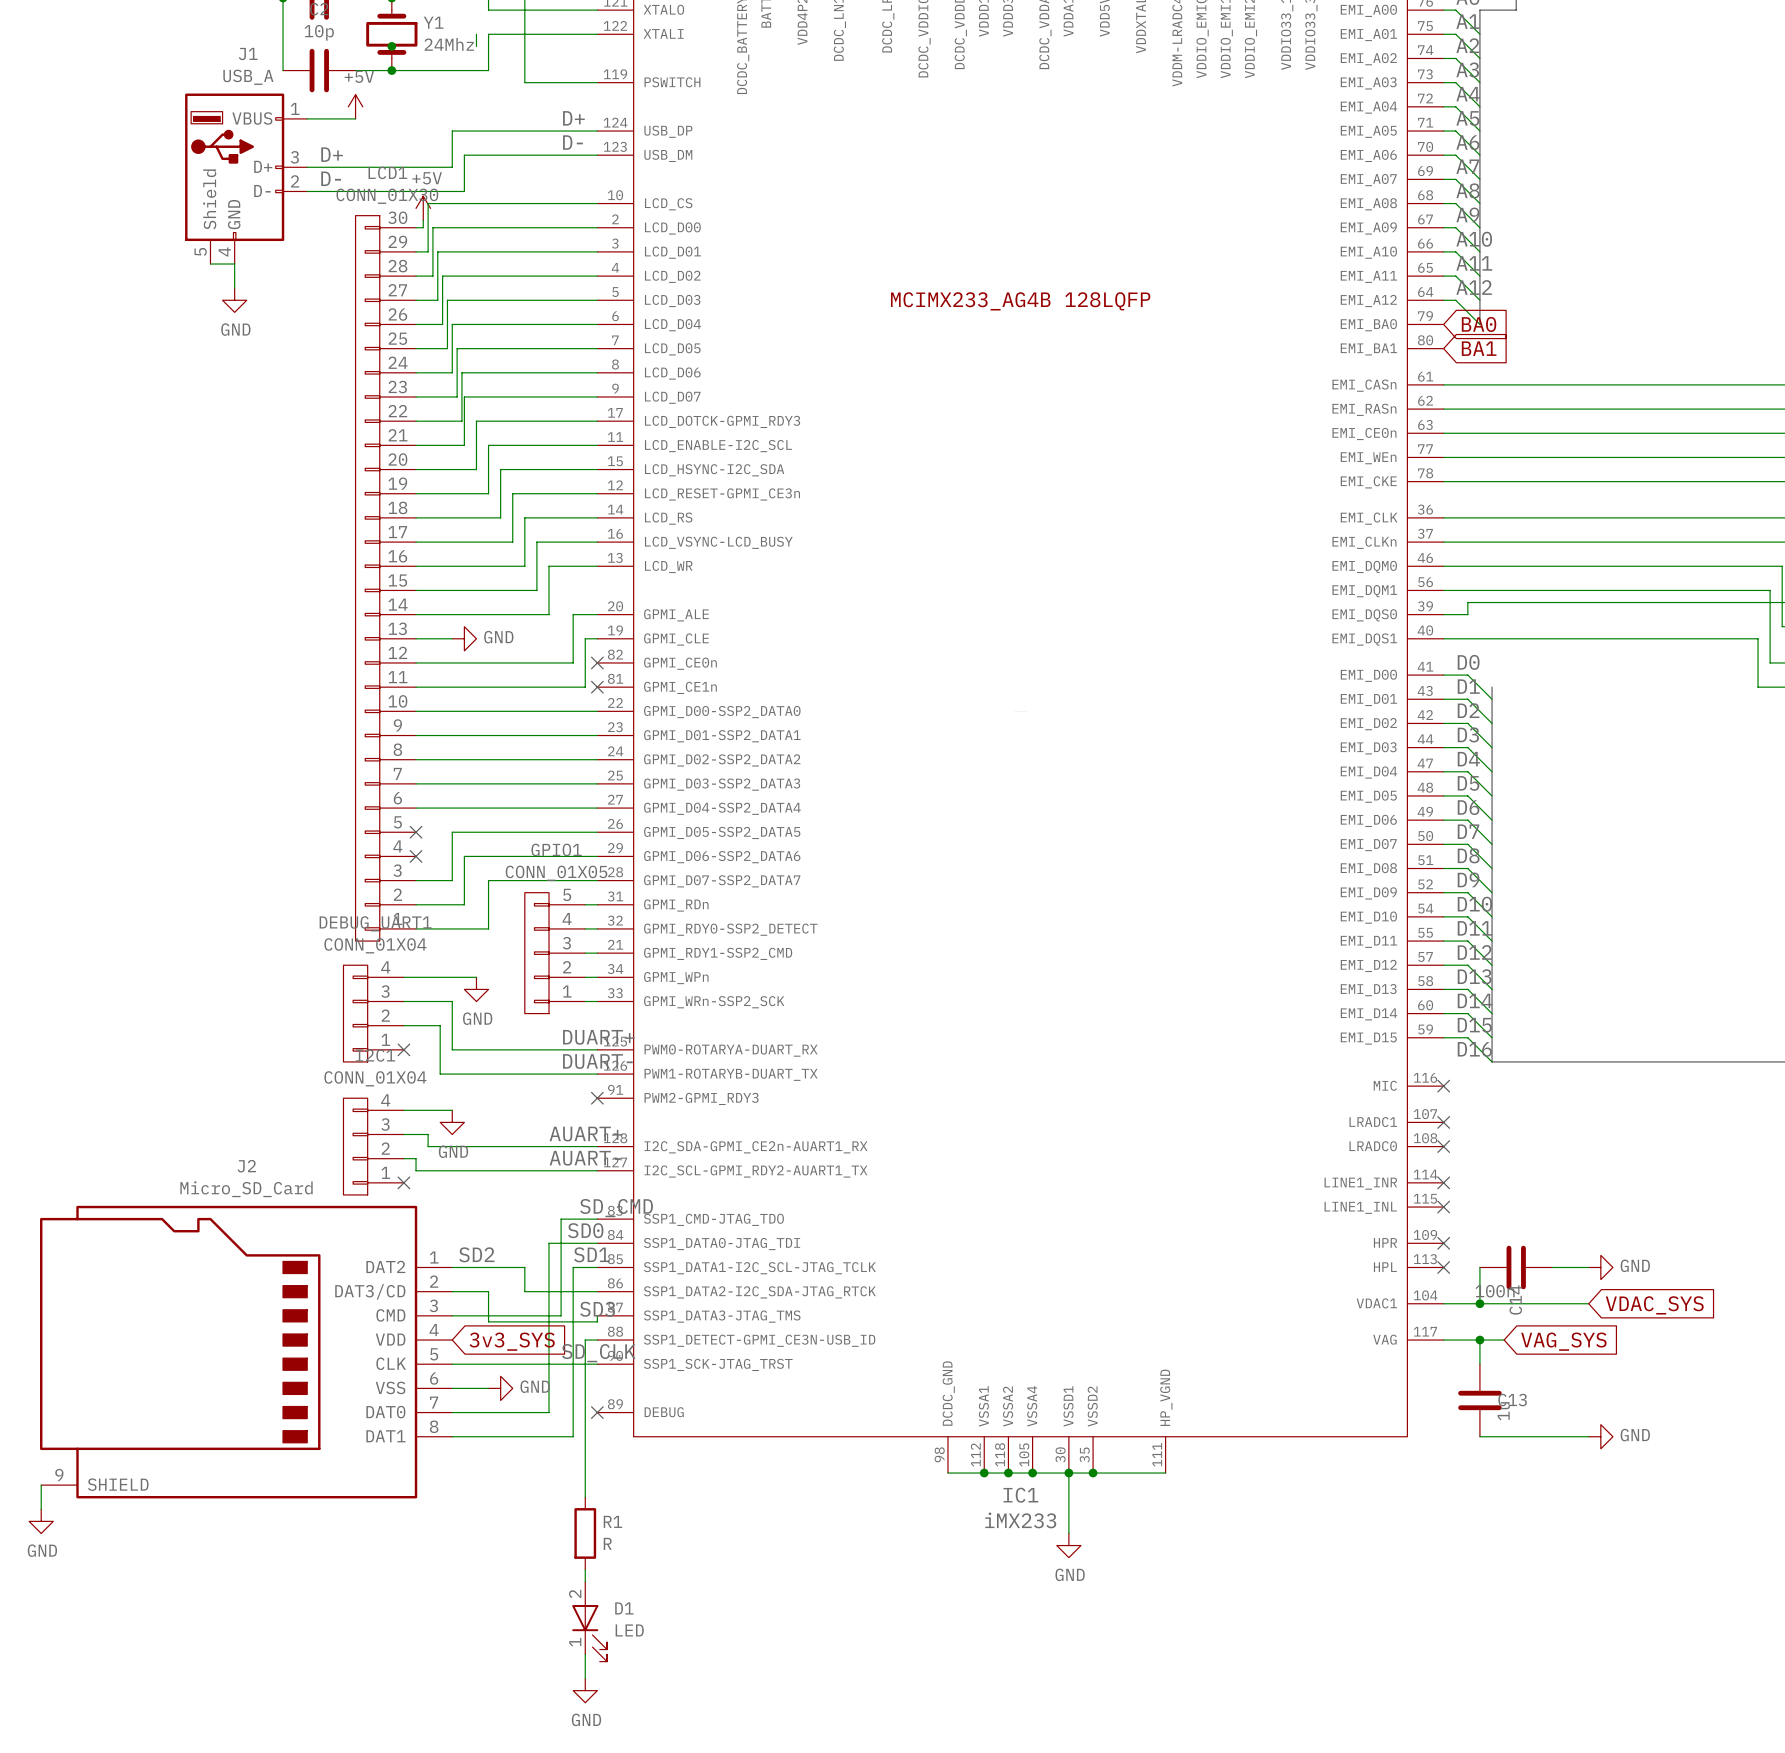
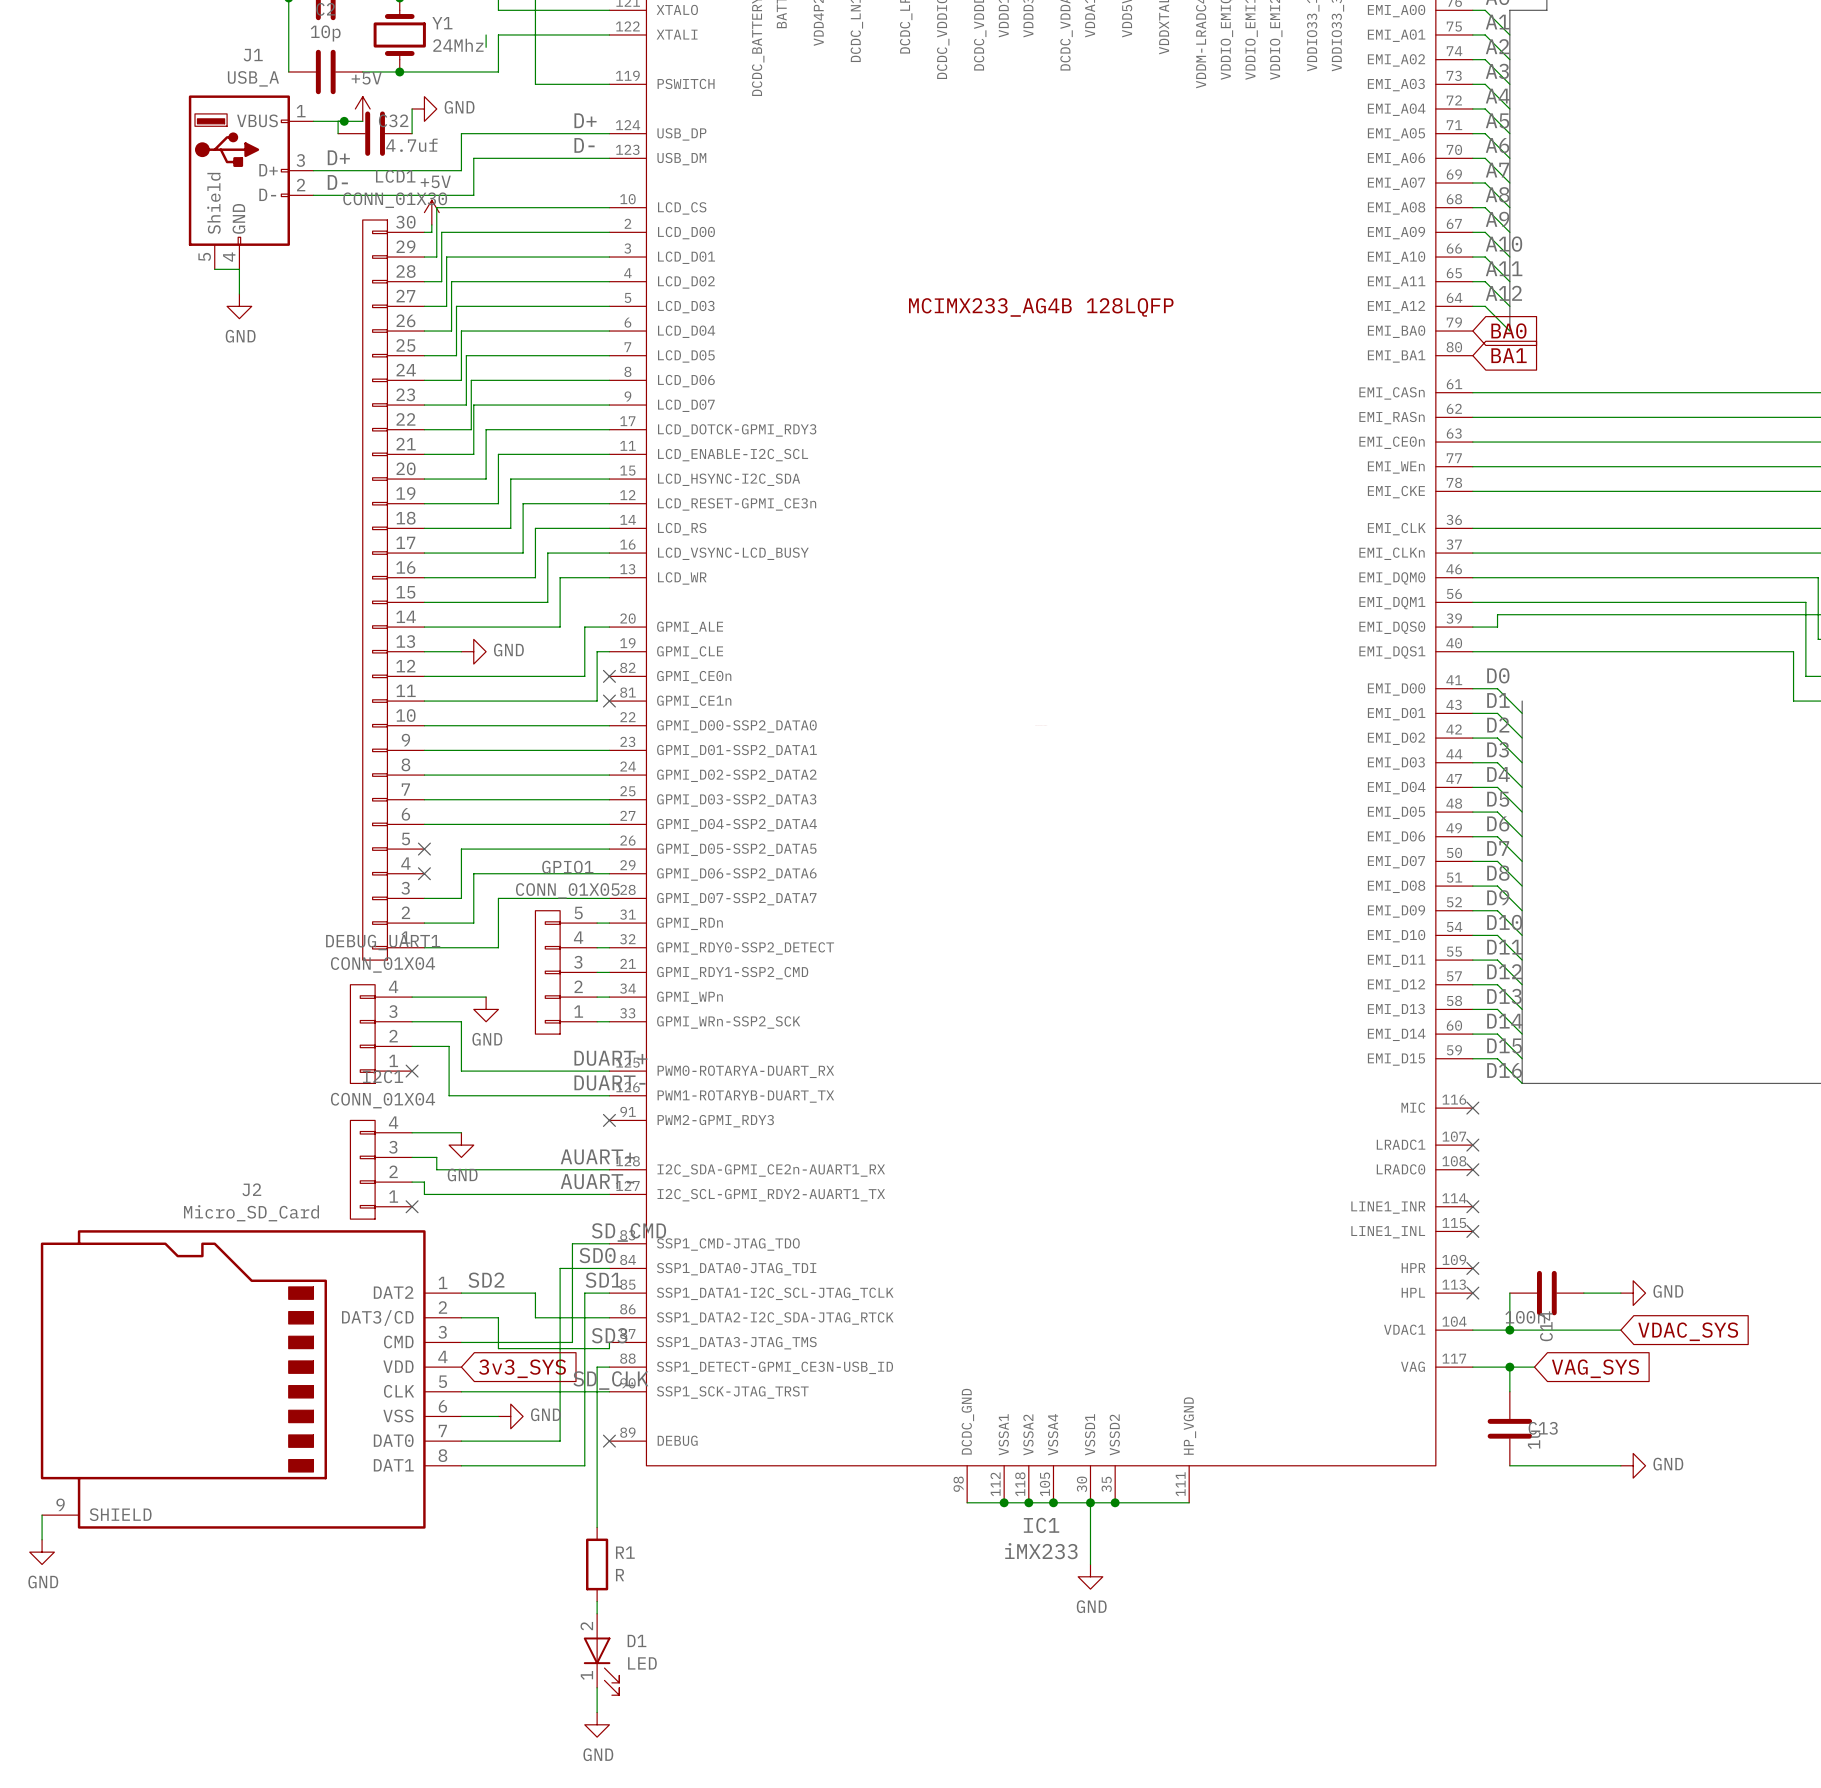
junction: (391, 46) -> none
wire: none -> (412, 108) (412, 133)
power symbol: none -> GND (424, 108)
wire: none -> (338, 121) (338, 133)
junction: none -> (344, 121)
C32: none -> 4.7uf (375, 133)

